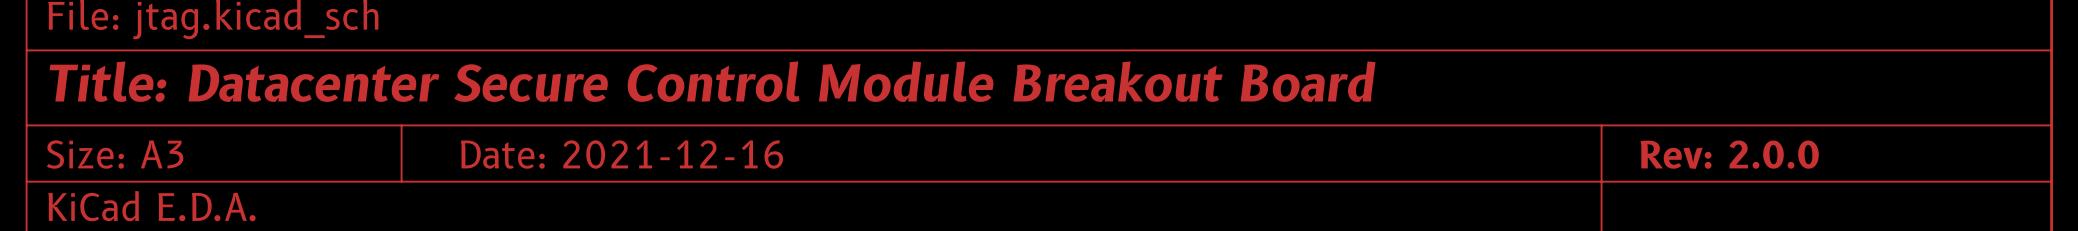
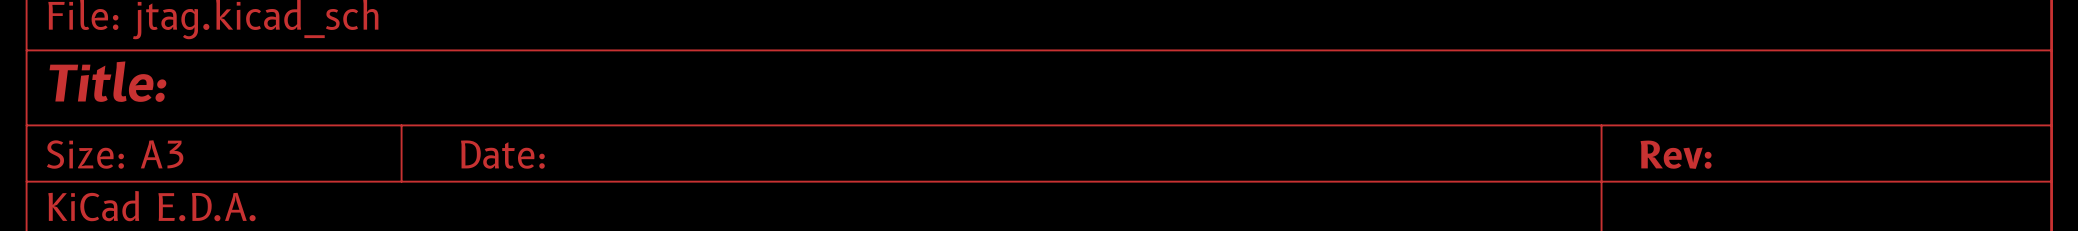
title block: Title: Datacenter Secure Control Module Breakout Board (712, 81) -> Title: (107, 81)
title block: Date: 2021-12-16 (622, 154) -> Date: (502, 154)
title block: Rev: 2.0.0 (1729, 154) -> Rev: (1676, 154)

